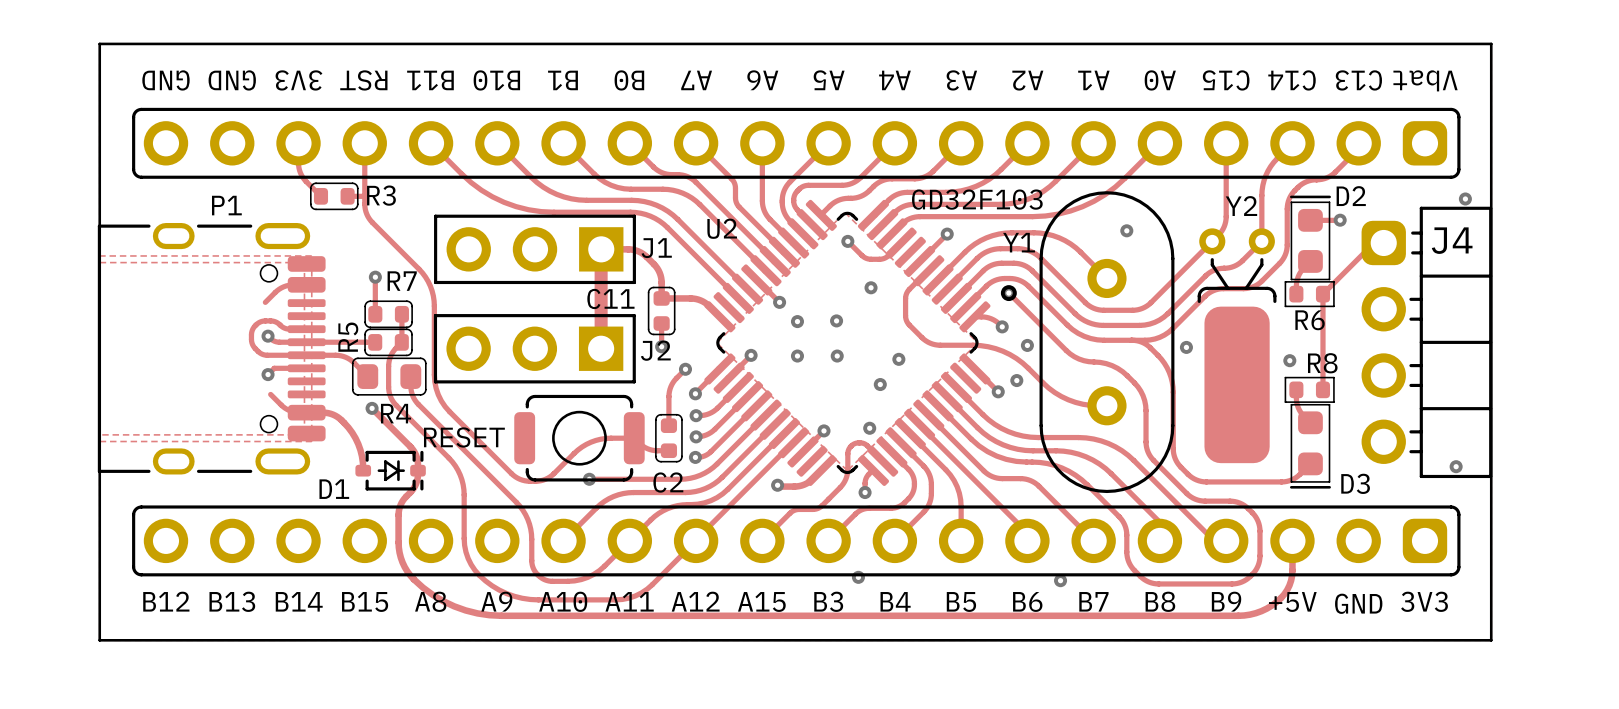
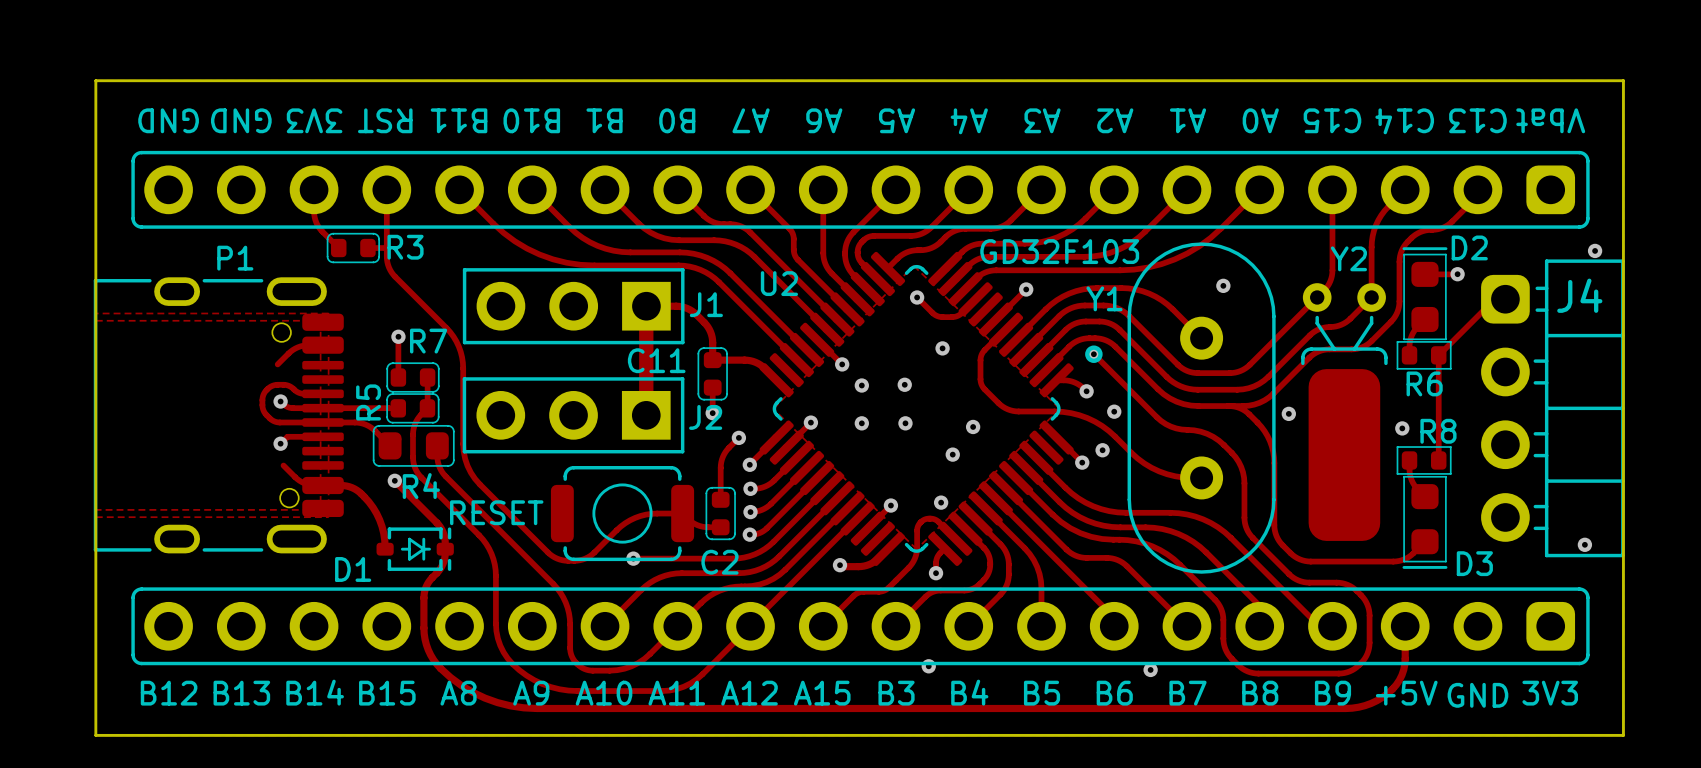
P1 footprint: [97, 223, 326, 475] -> [93, 277, 344, 554]

